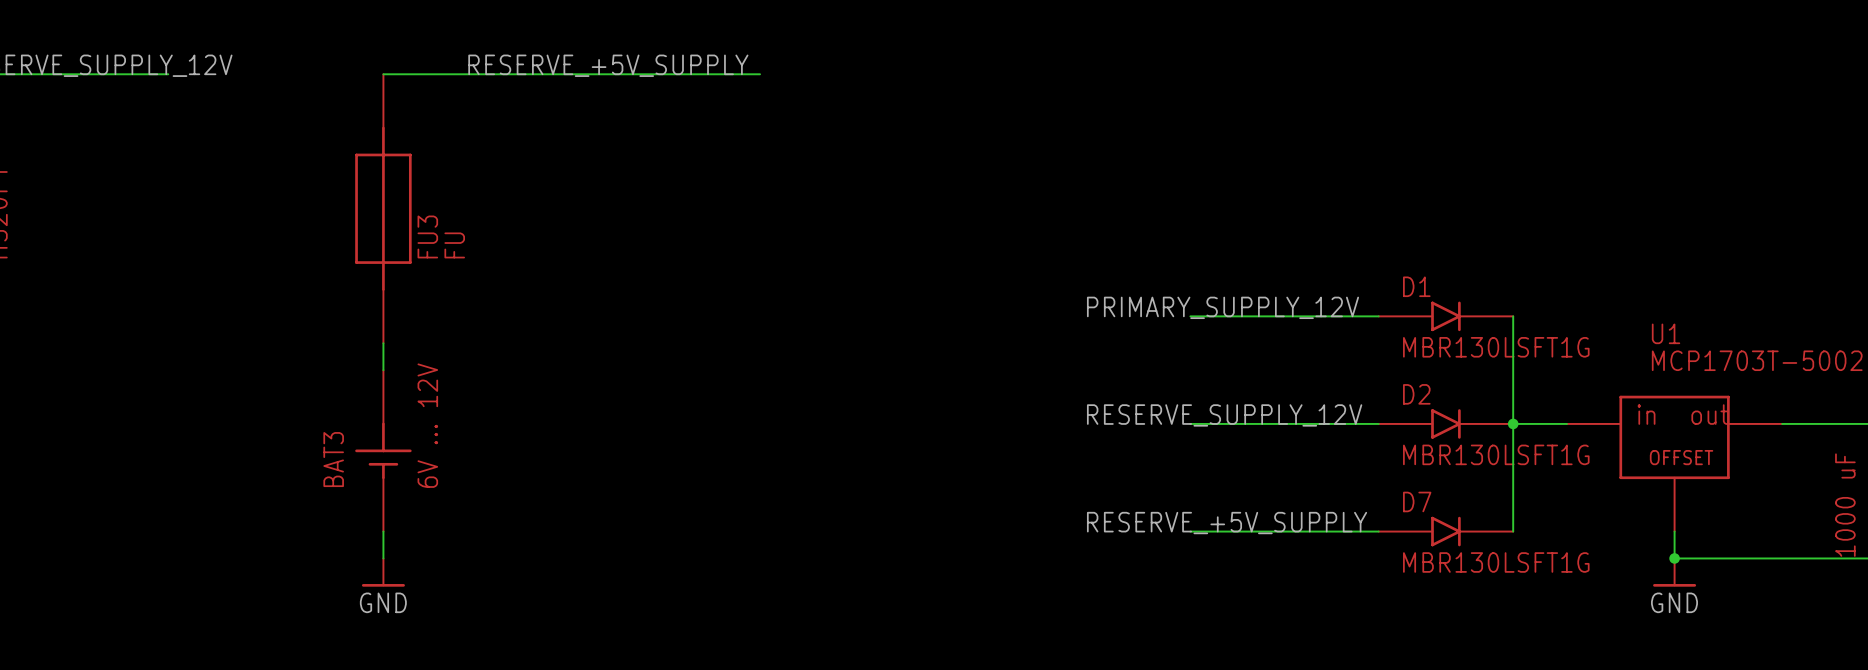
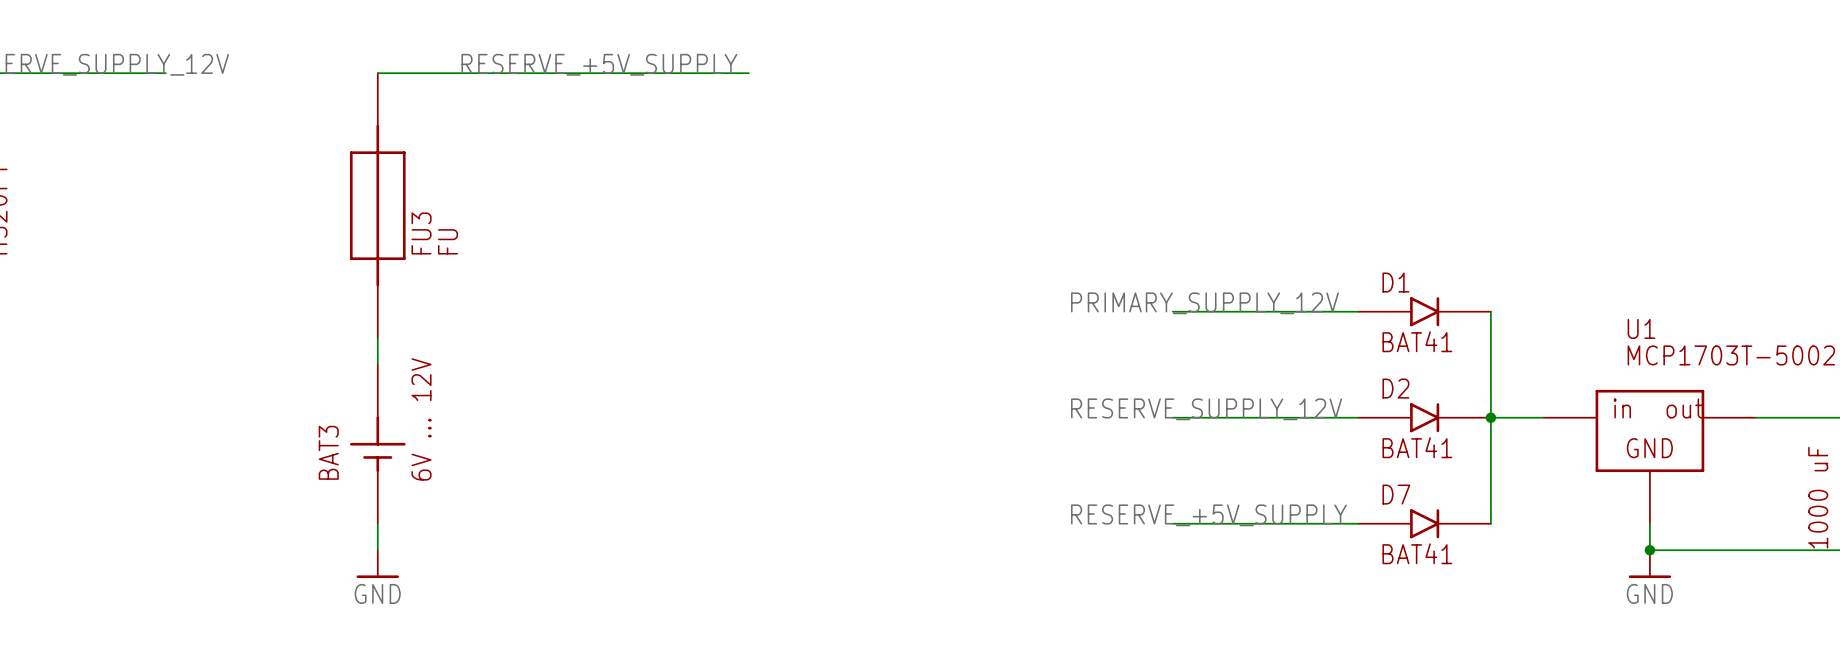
D1 value: MBR130LSFT1G (1496, 347) -> BAT41 (1417, 341)
D2 value: MBR130LSFT1G (1496, 454) -> BAT41 (1417, 447)
U1 text: none -> GND (1649, 448)
U1 text: OFFSET (1681, 457) -> none
D7 value: MBR130LSFT1G (1496, 562) -> BAT41 (1417, 553)

